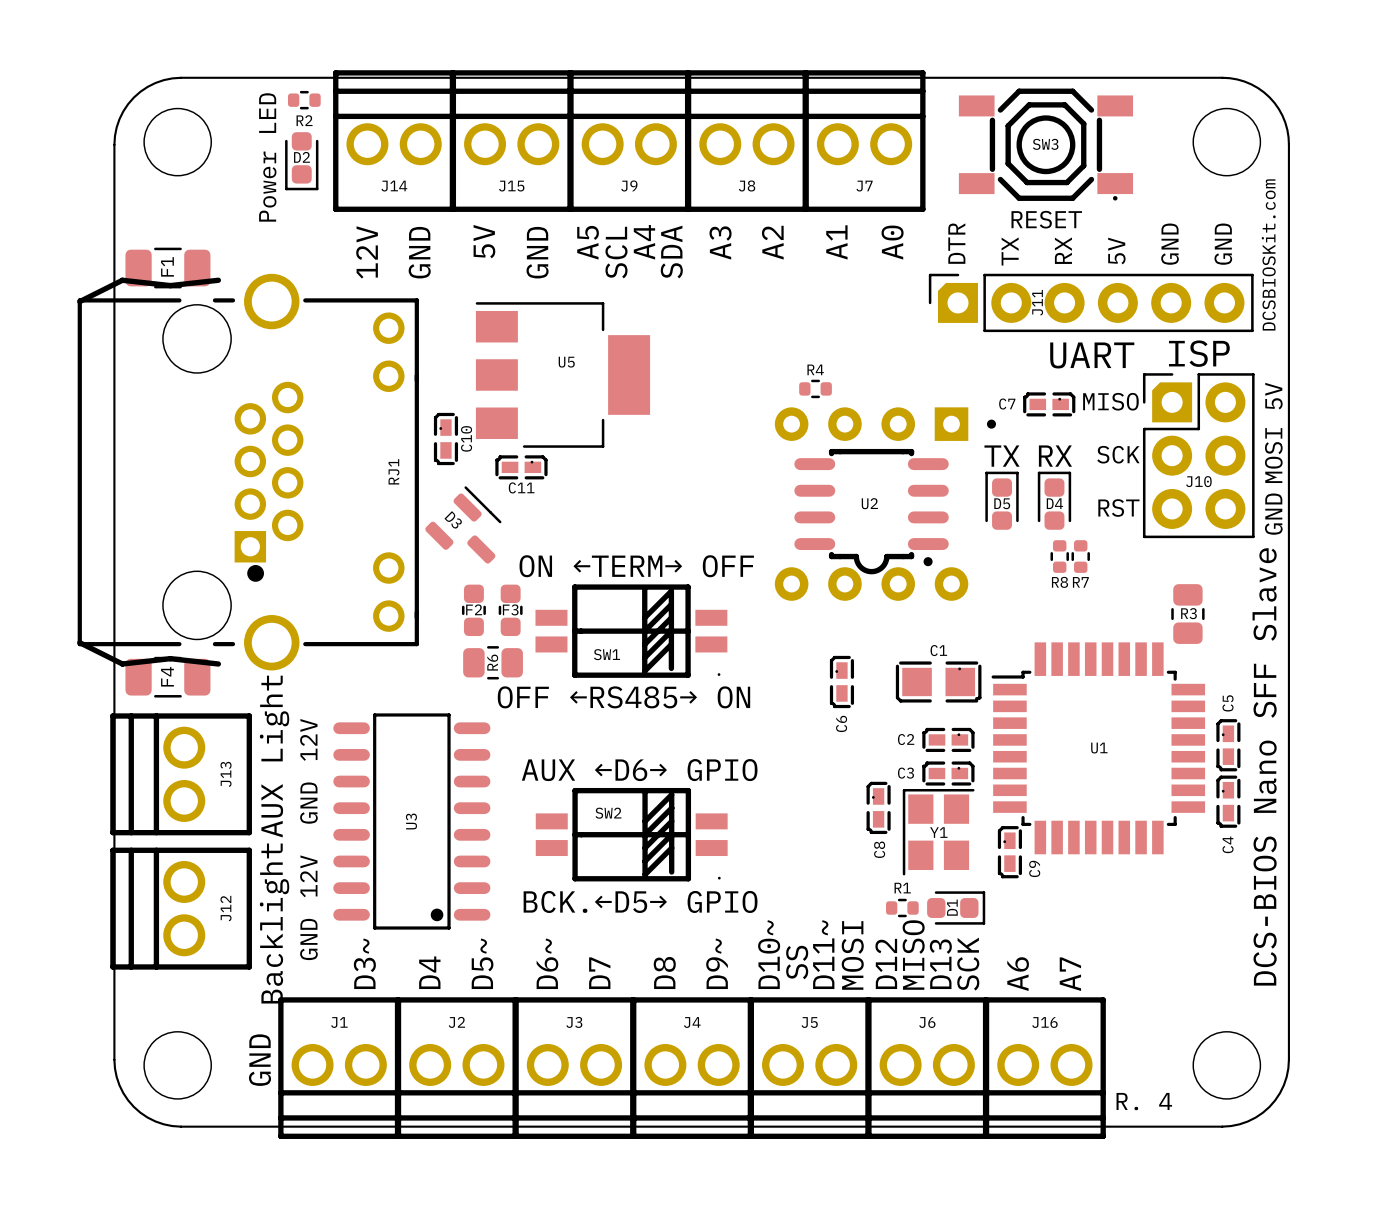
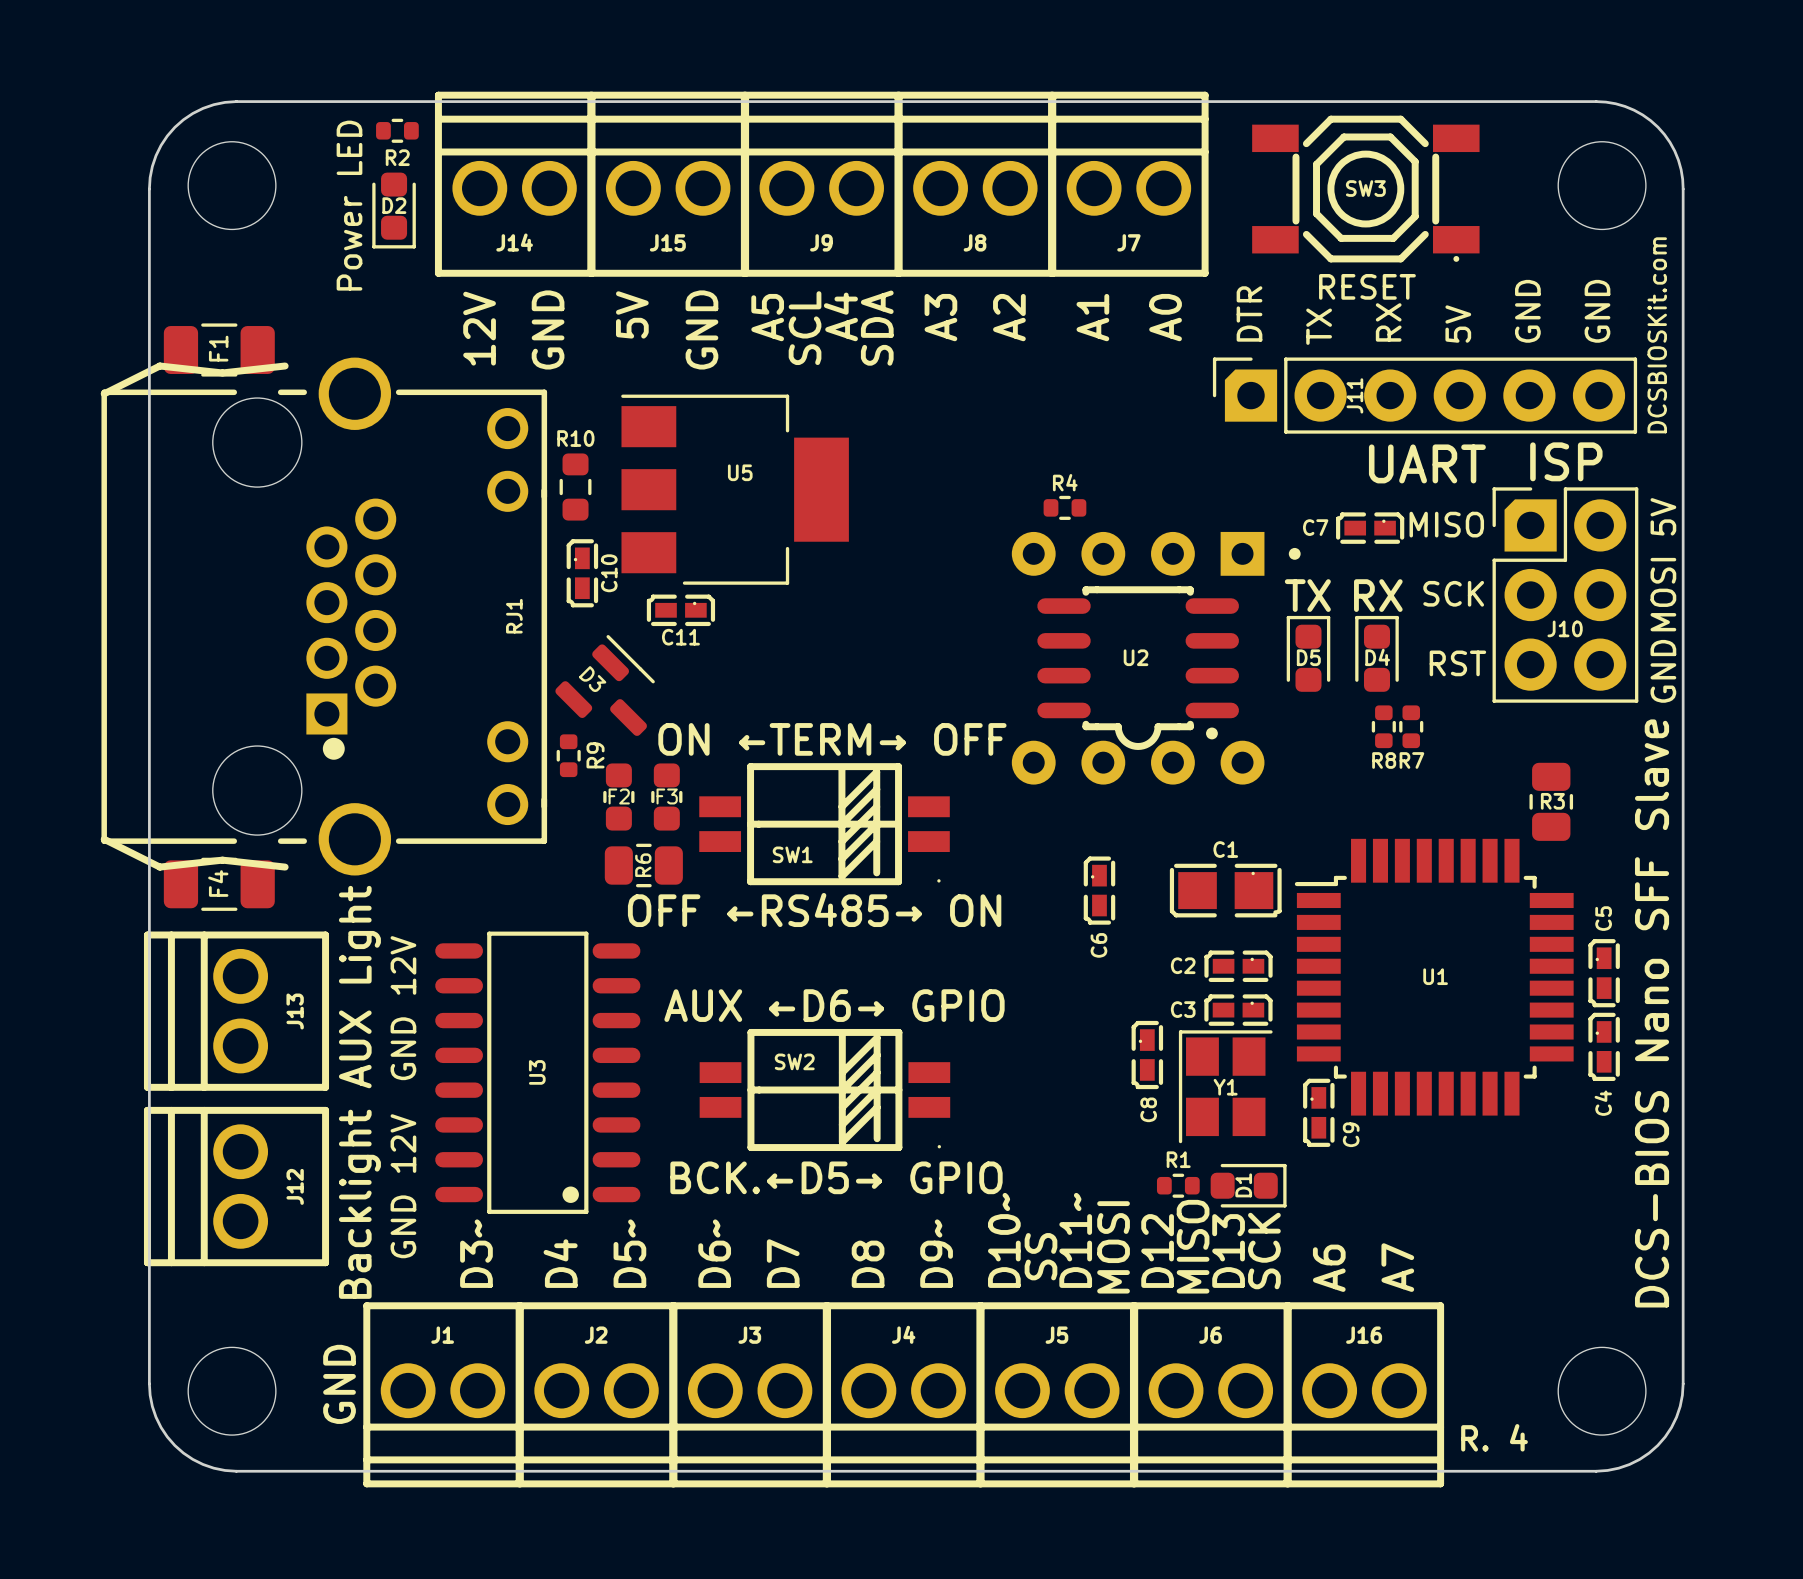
R10: none -> (575, 487)
R9: none -> (568, 755)

